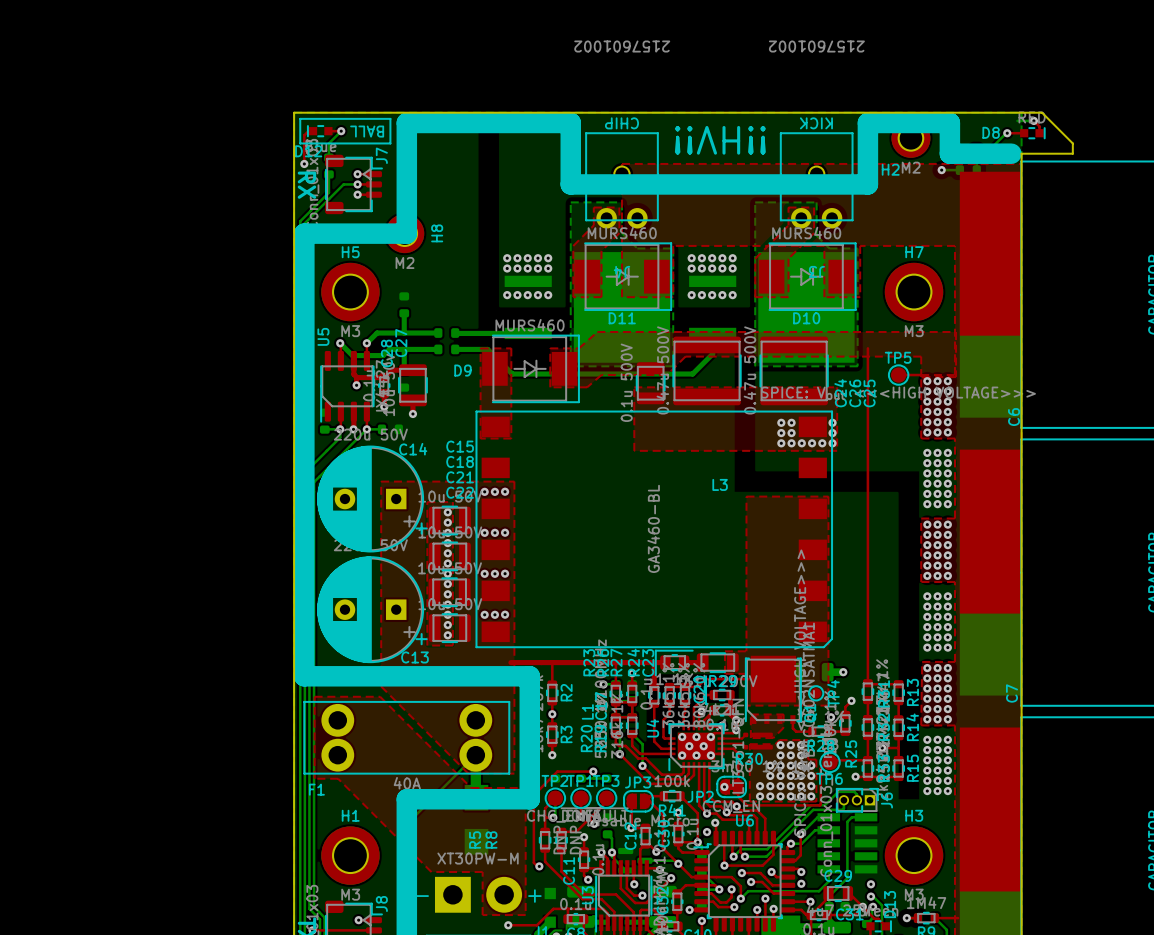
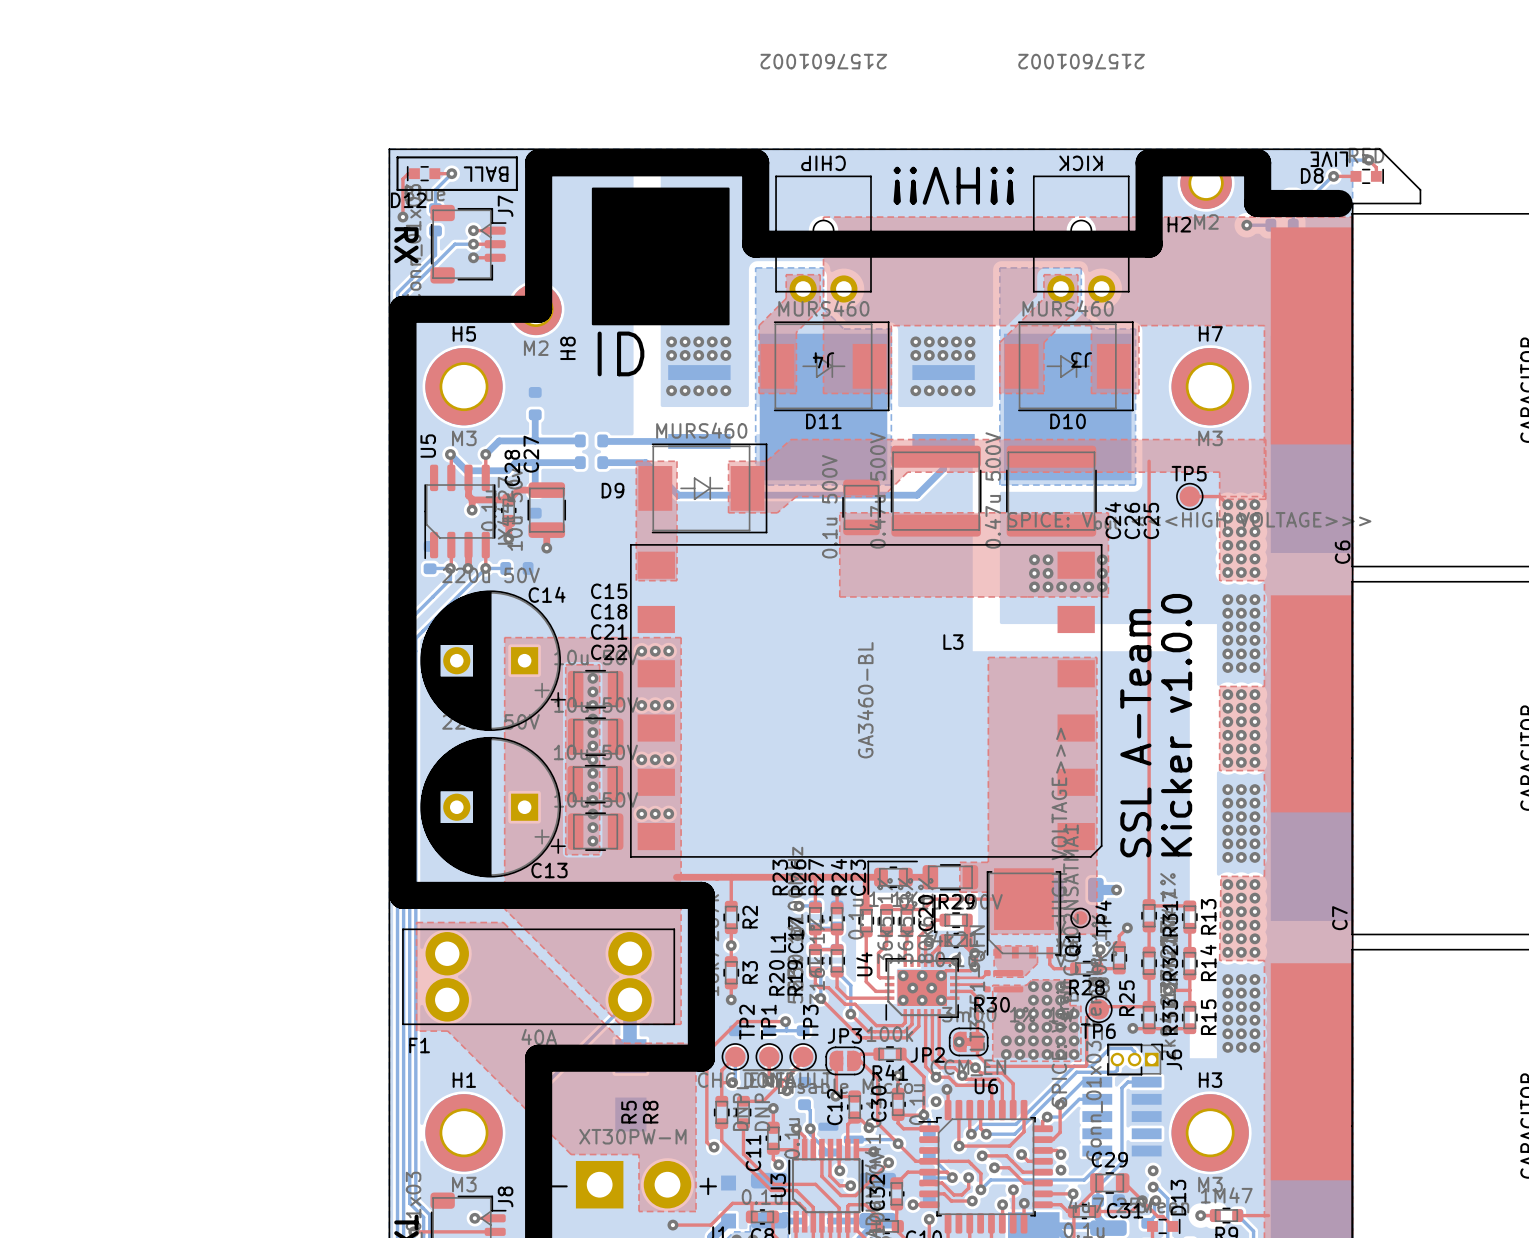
text: none -> LIVE (1329, 159)
drawing: none -> [591, 187, 730, 326]
H8 name position: H8 (437, 233) -> H8 (567, 348)
text: none -> ID (620, 353)
text: none -> Kicker v1.0.0 (1176, 725)
text: none -> SSL A-Team (1135, 733)
TP2 name rotation: 0° (554, 780) -> 90° counterclockwise (747, 1022)
TP1 name rotation: 0° (580, 780) -> 90° counterclockwise (768, 1022)
TP3 name rotation: 0° (606, 780) -> 90° counterclockwise (810, 1022)

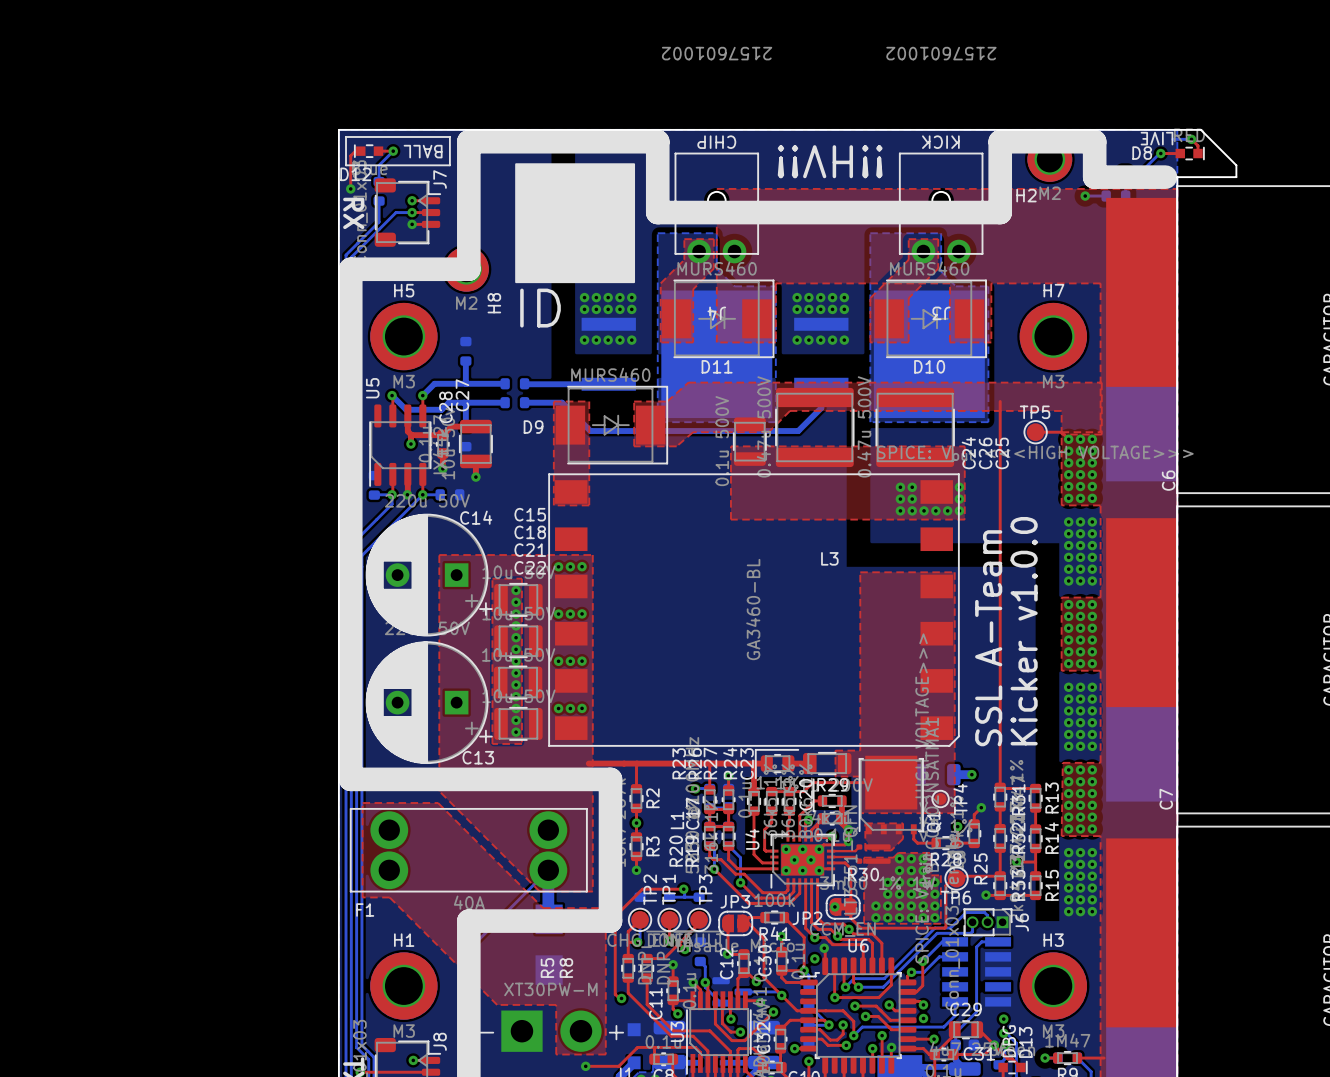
text: none -> DBG (1009, 1041)

